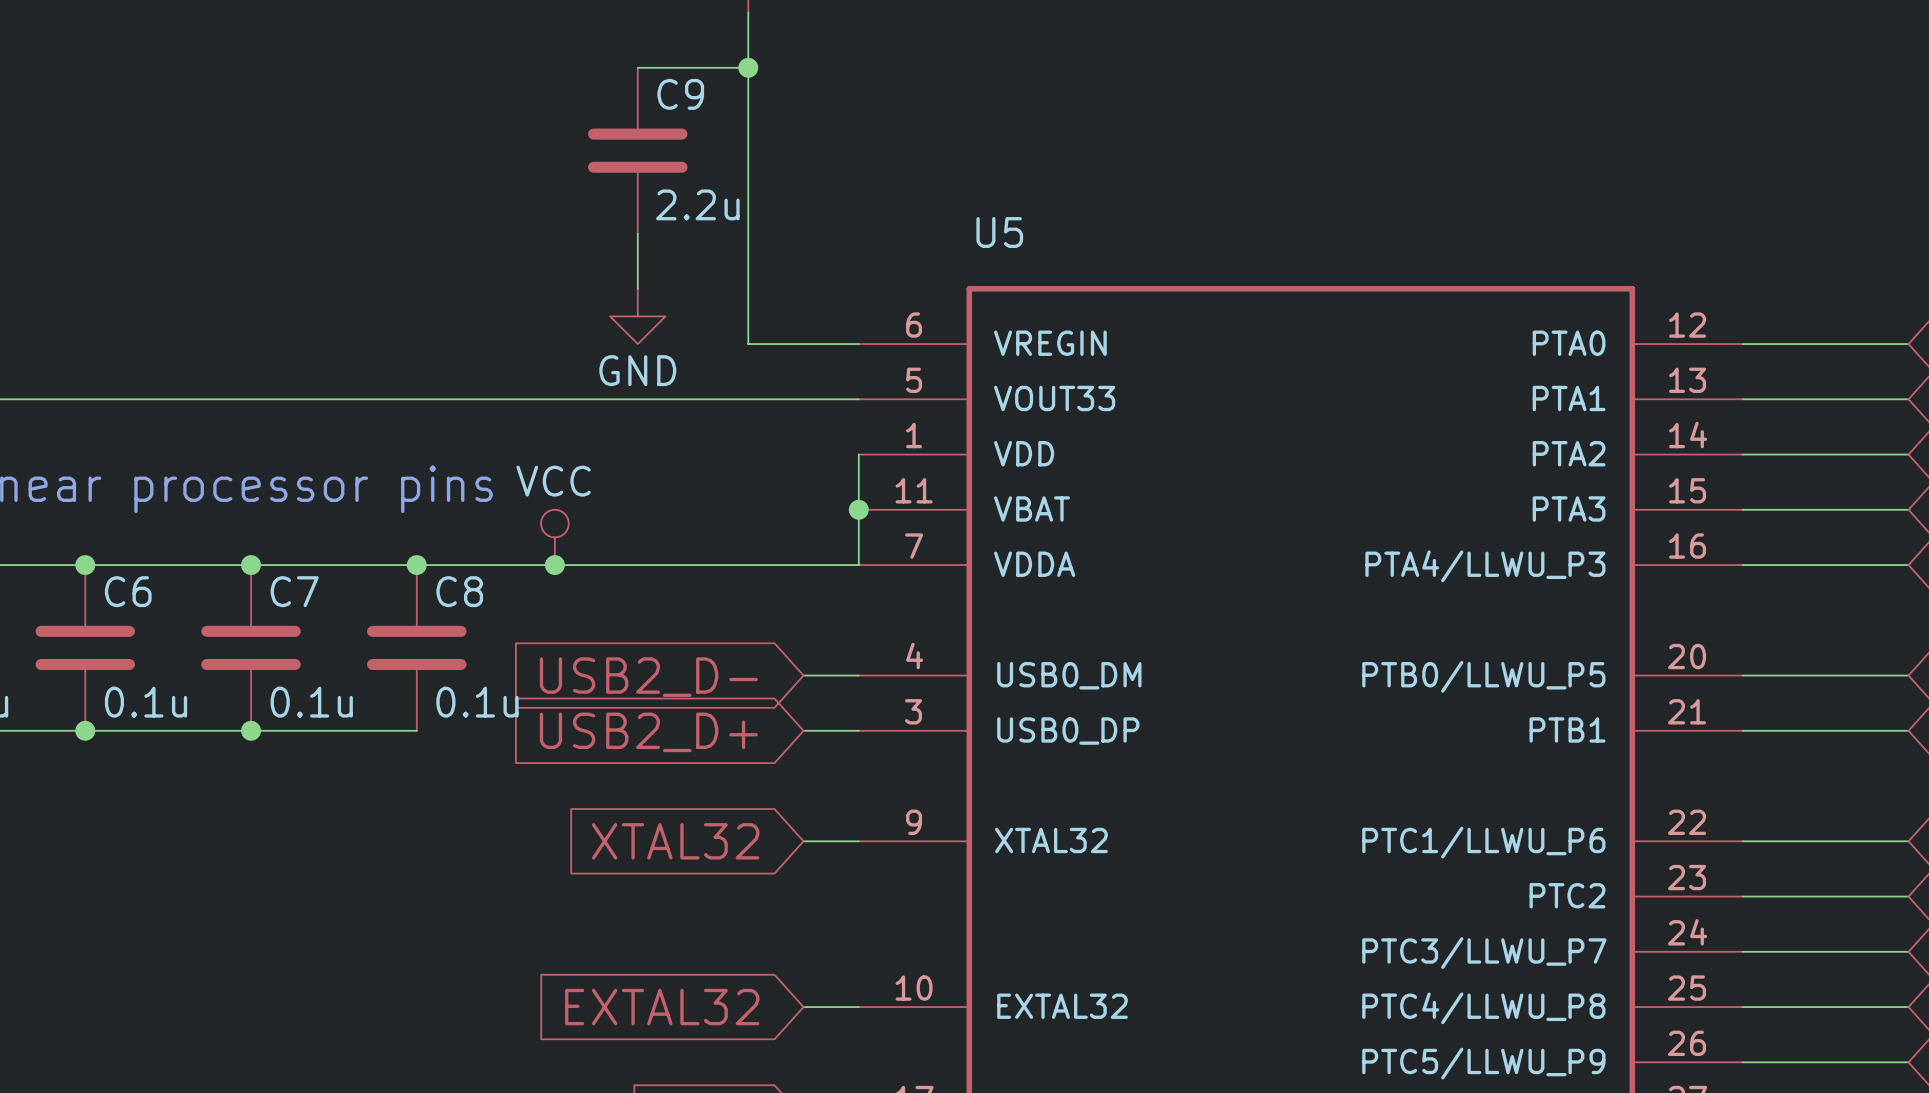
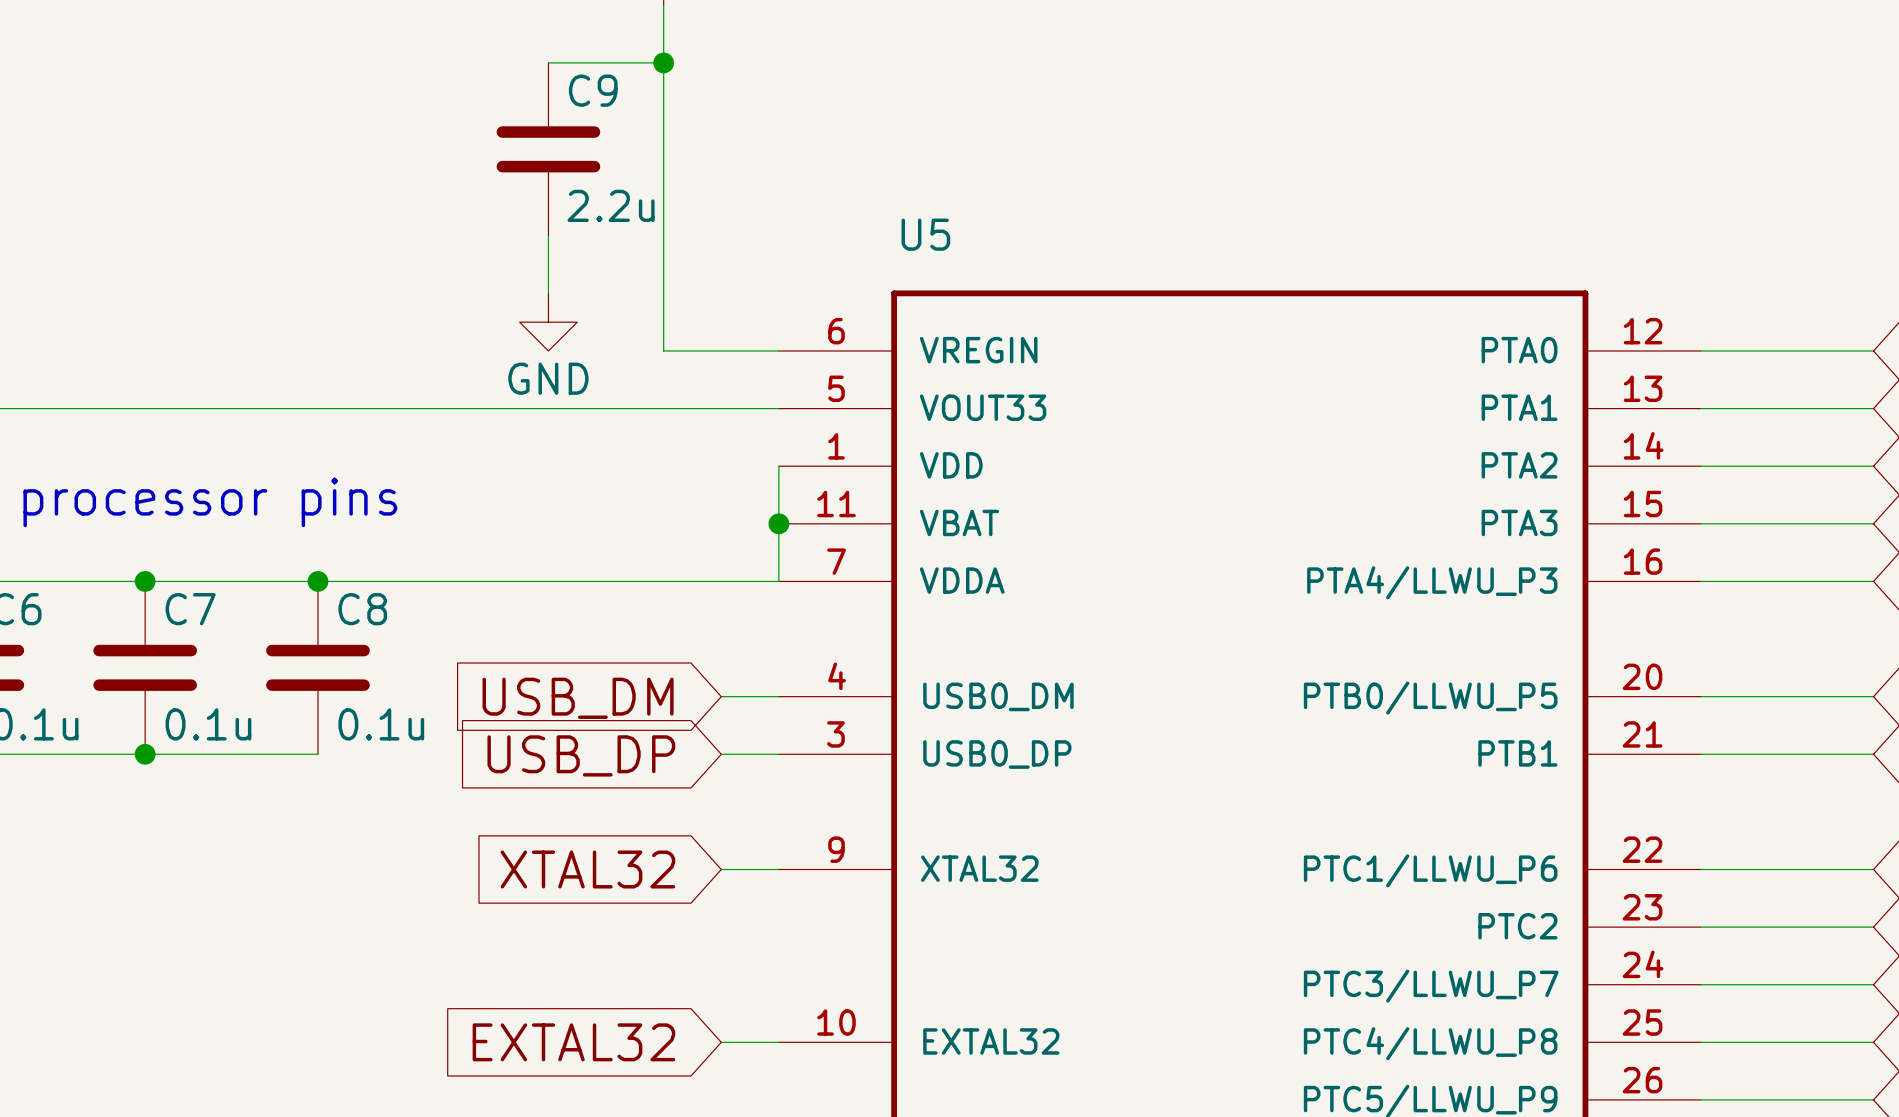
power symbol: VCC (554, 537) -> none
junction: (554, 565) -> none
global label: USB2_D- (648, 677) -> USB_DM (578, 698)
global label: USB2_D+ (648, 732) -> USB_DP (581, 755)

